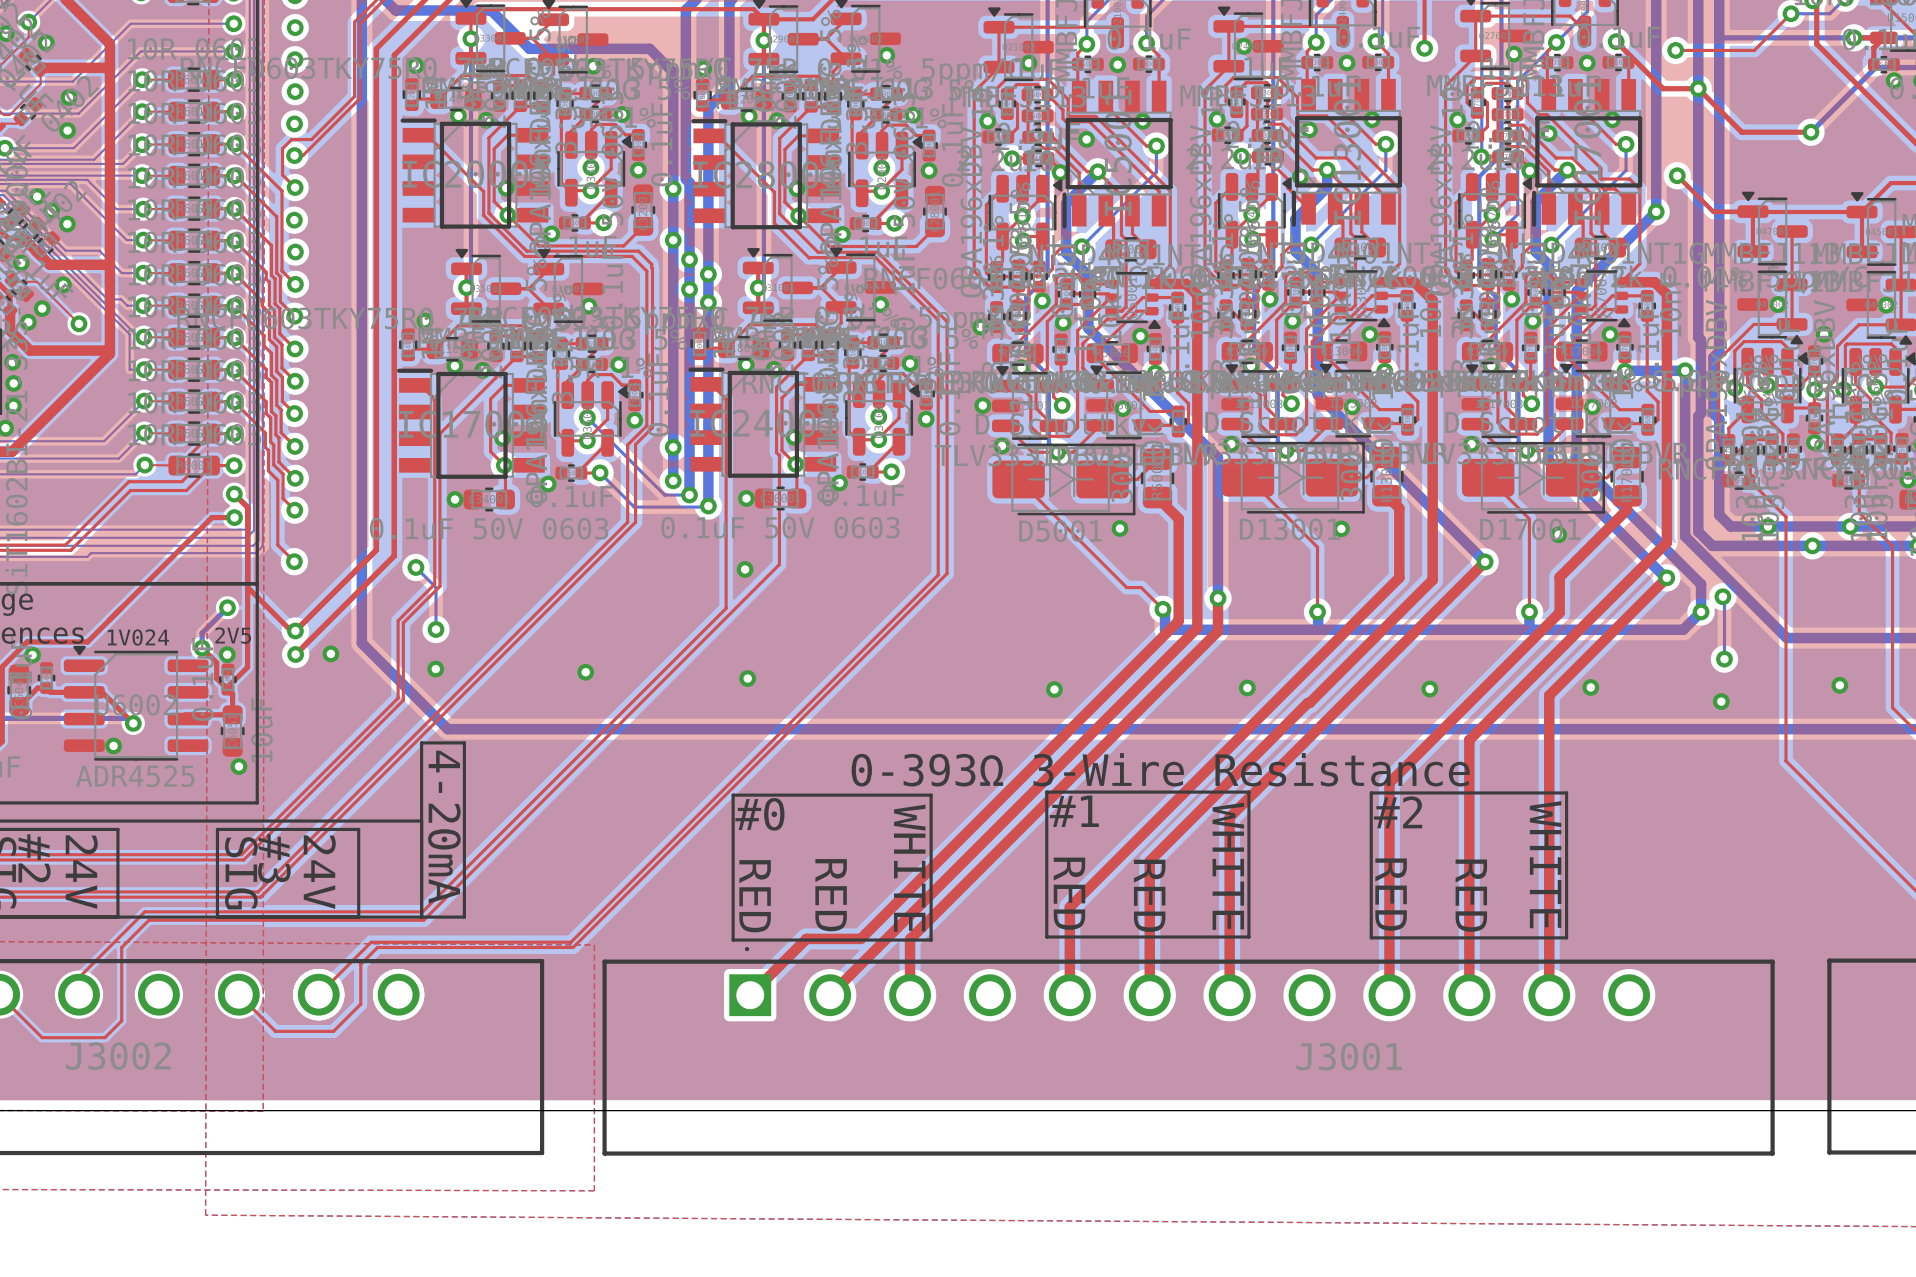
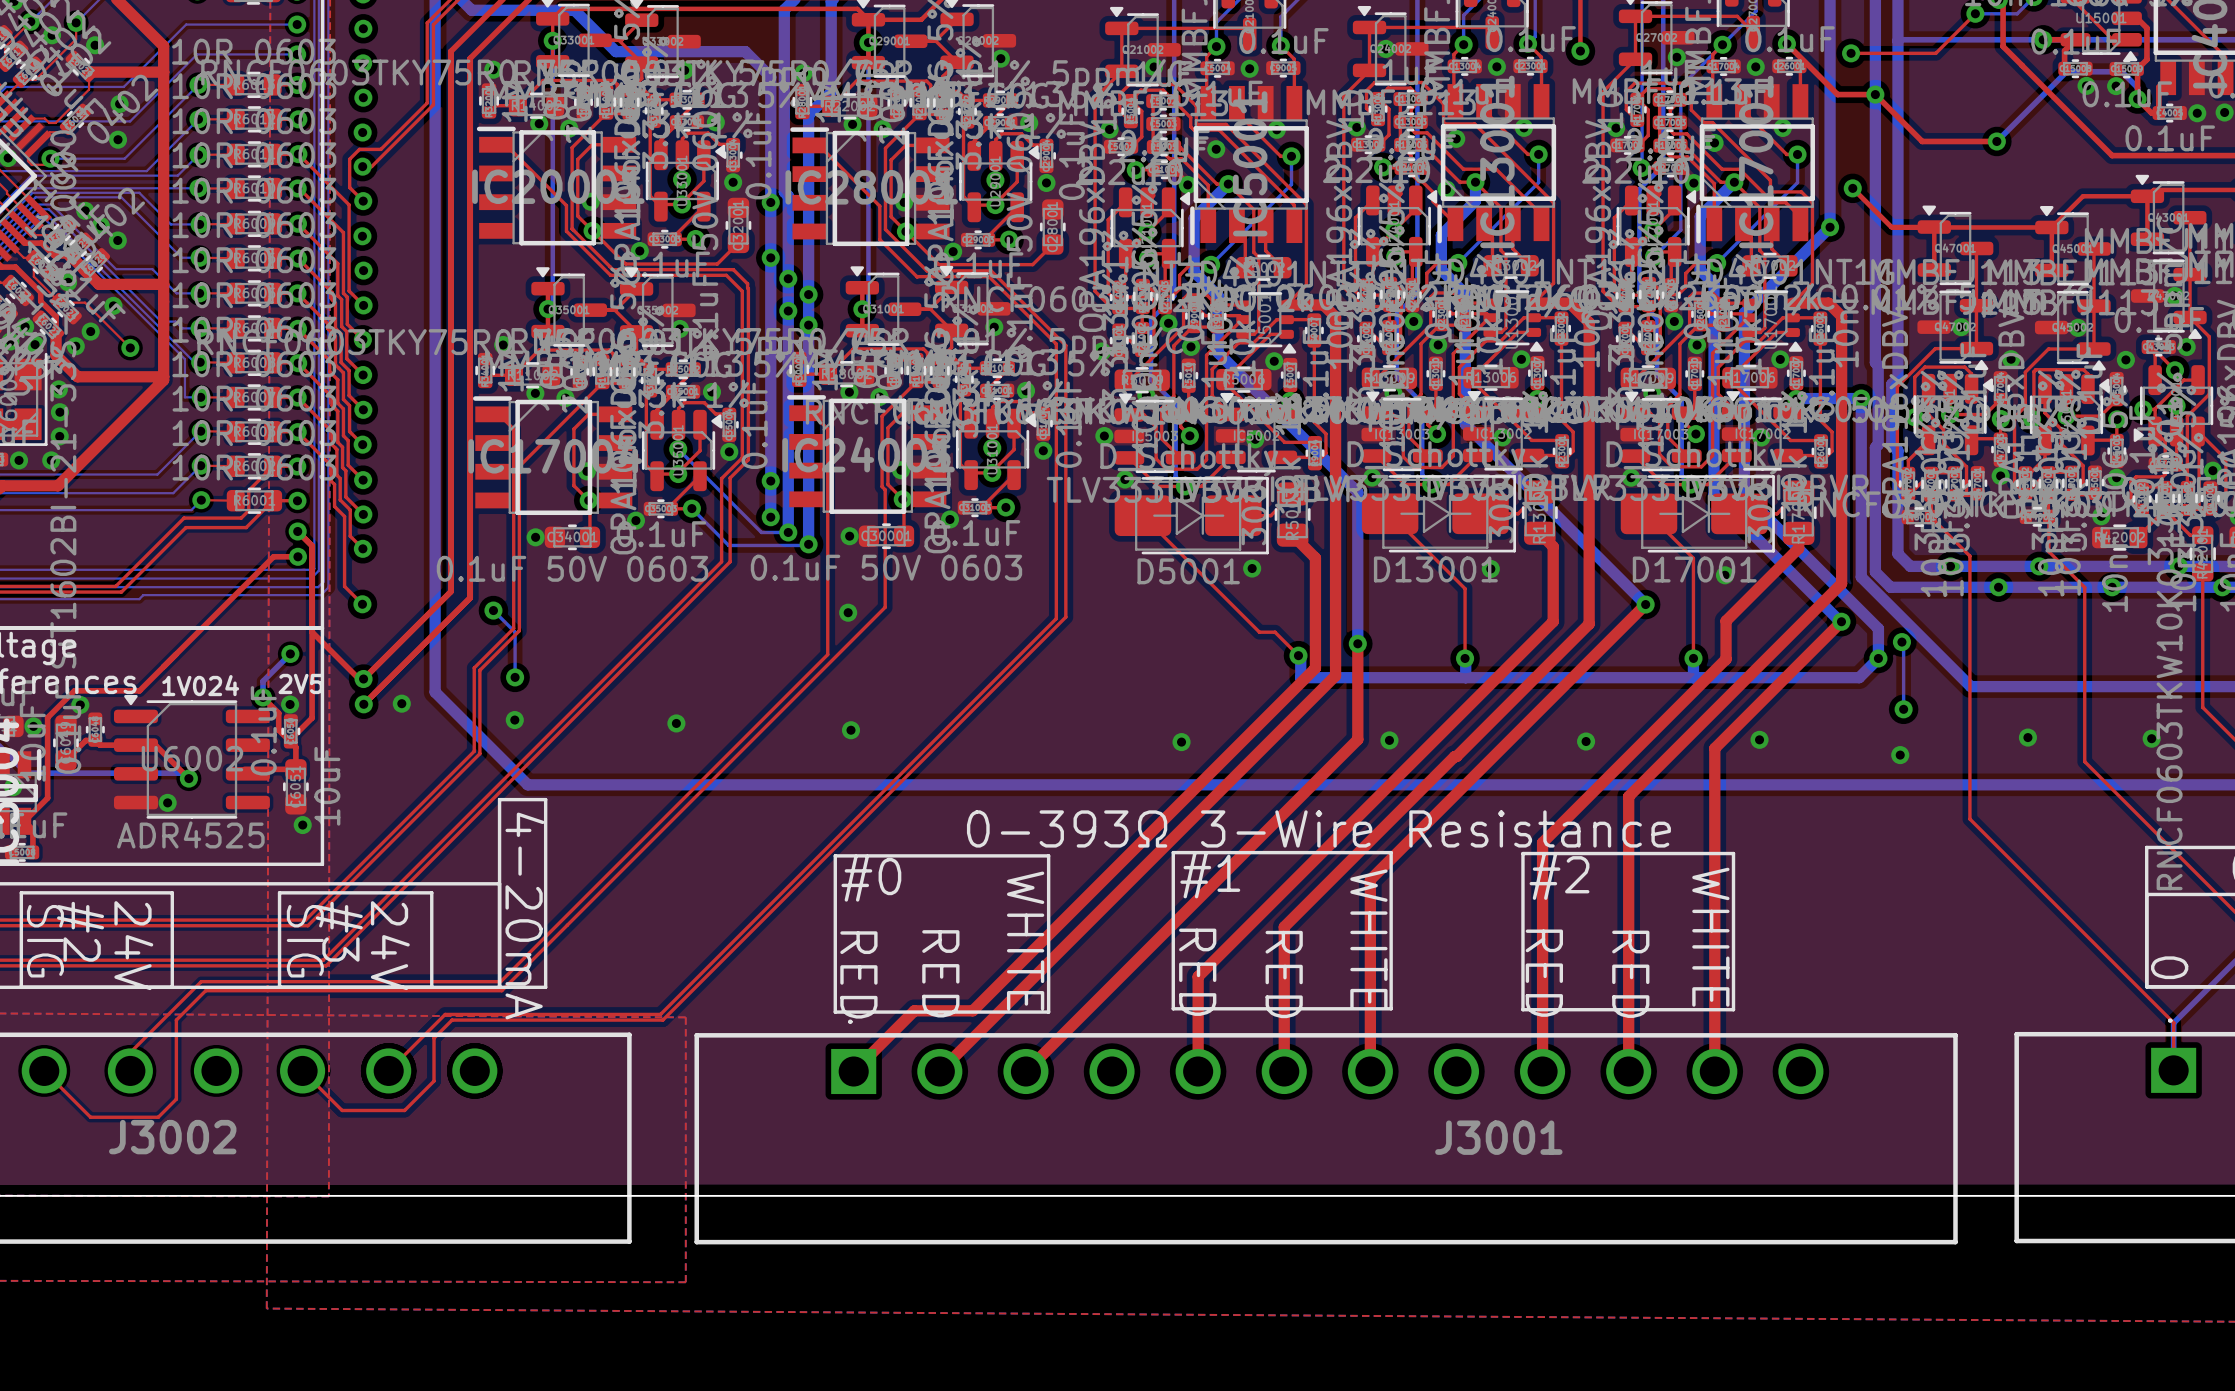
top track: (1218, 631) (910, 939) (910, 995) -> (1357, 679) (1357, 739) (1025, 1071)

